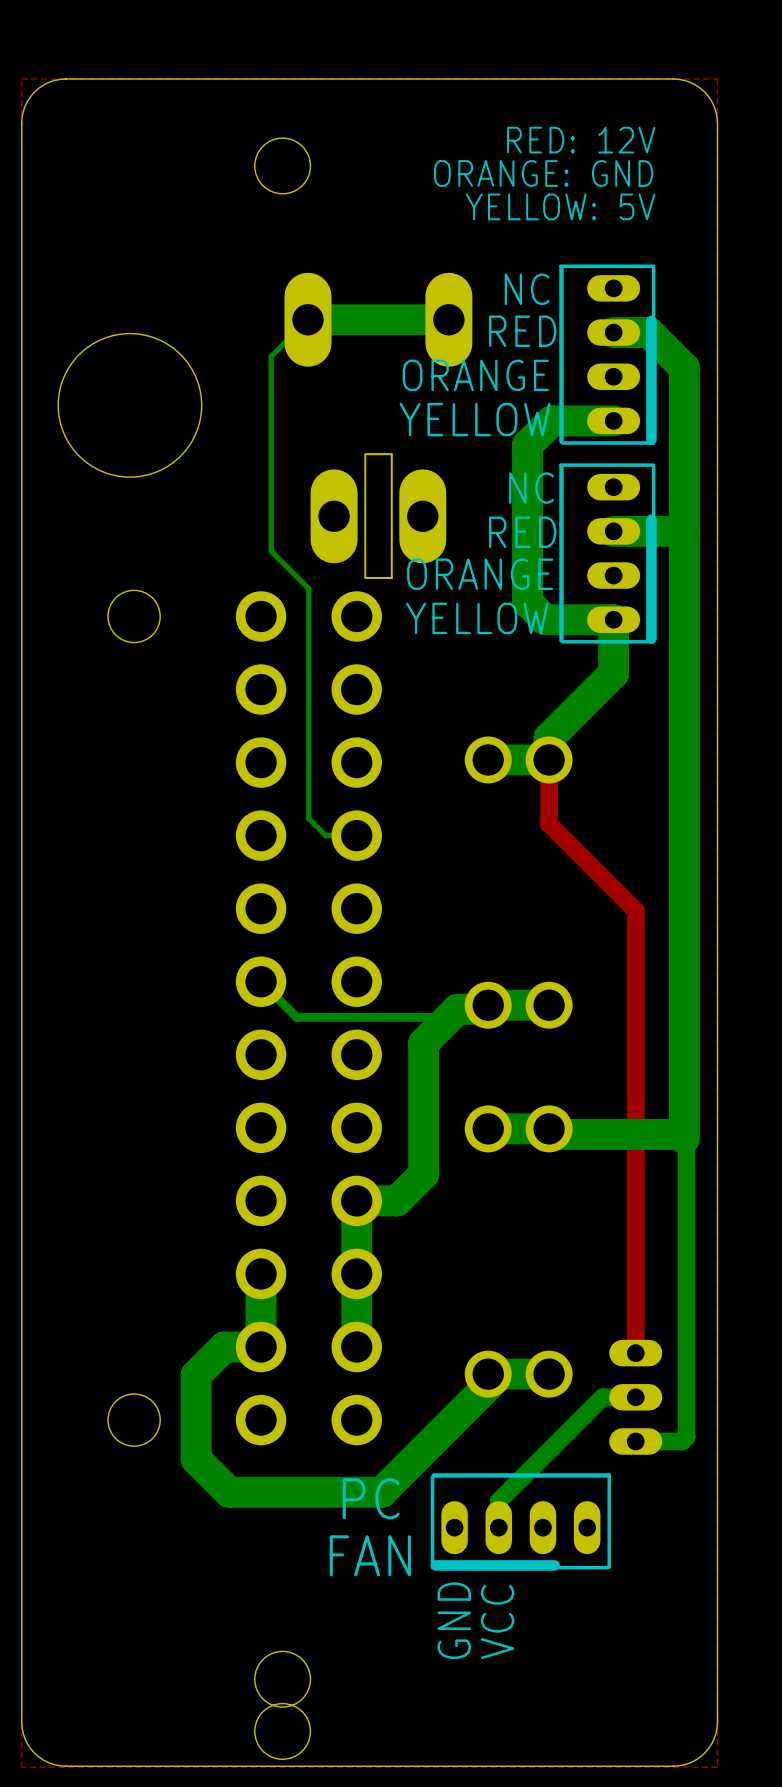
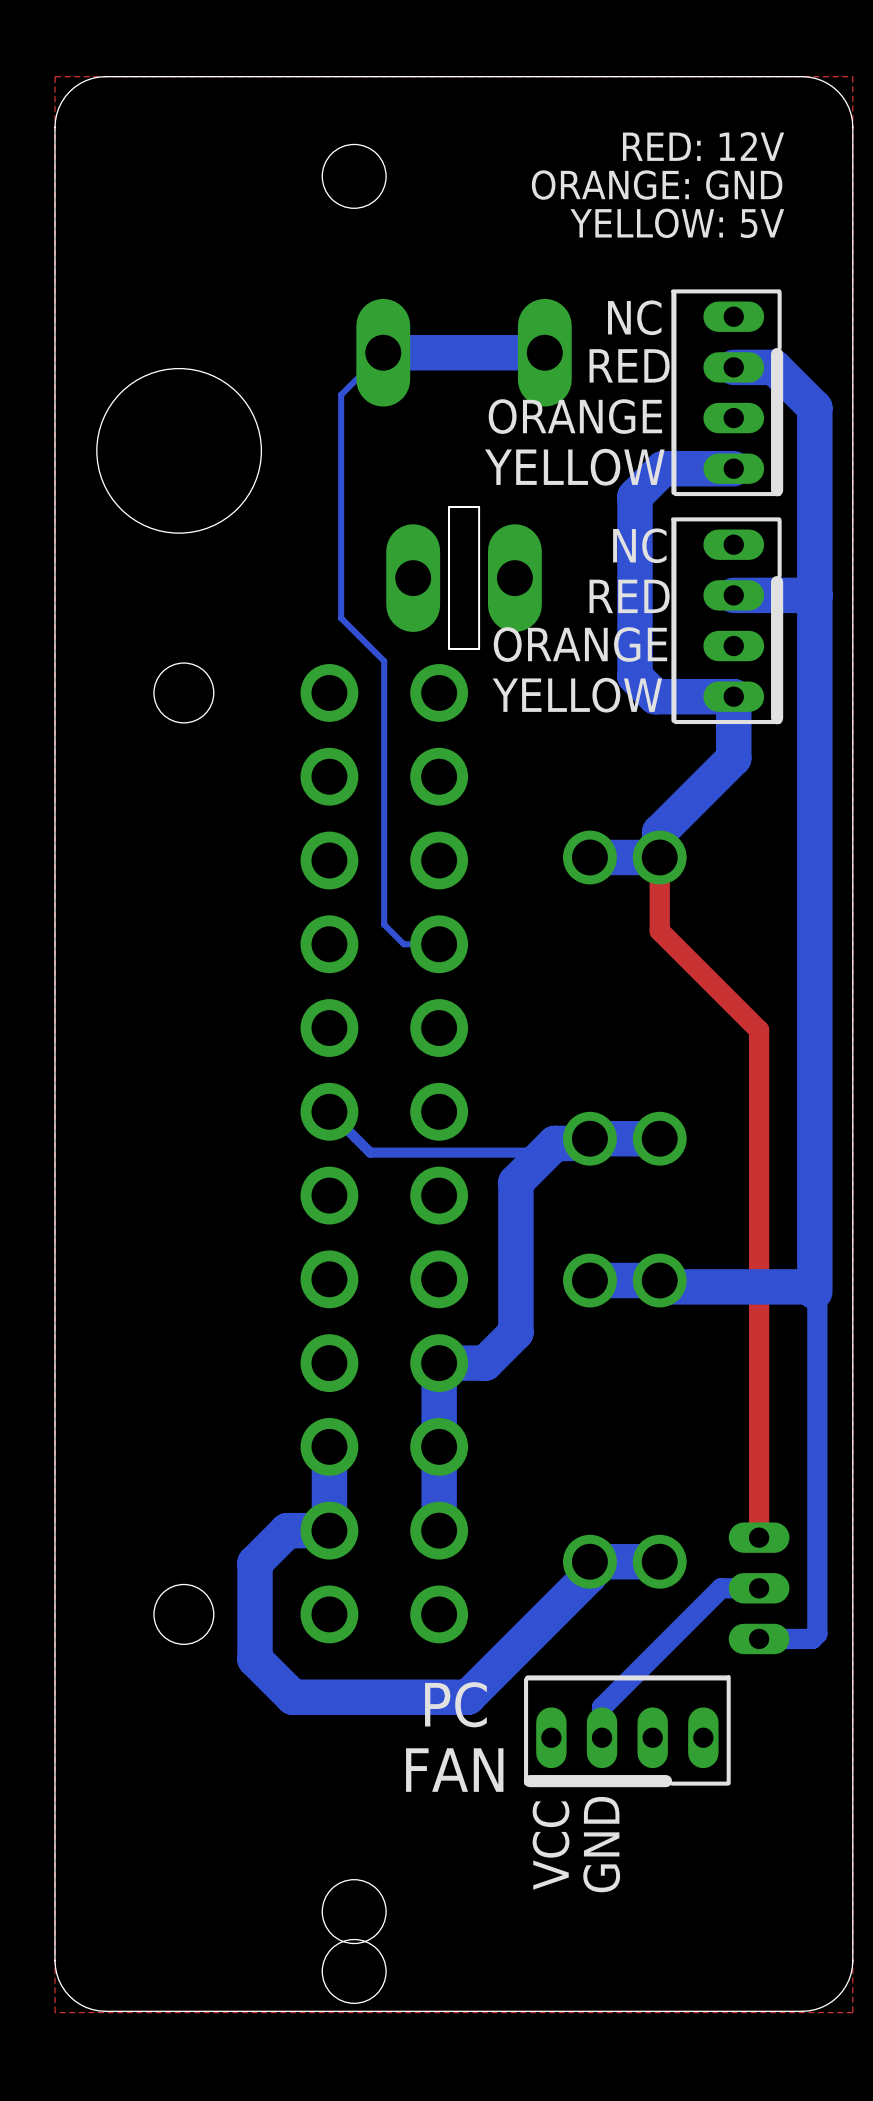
text: GND (454, 1620) -> VCC (551, 1845)
text: VCC (497, 1622) -> GND (601, 1844)

